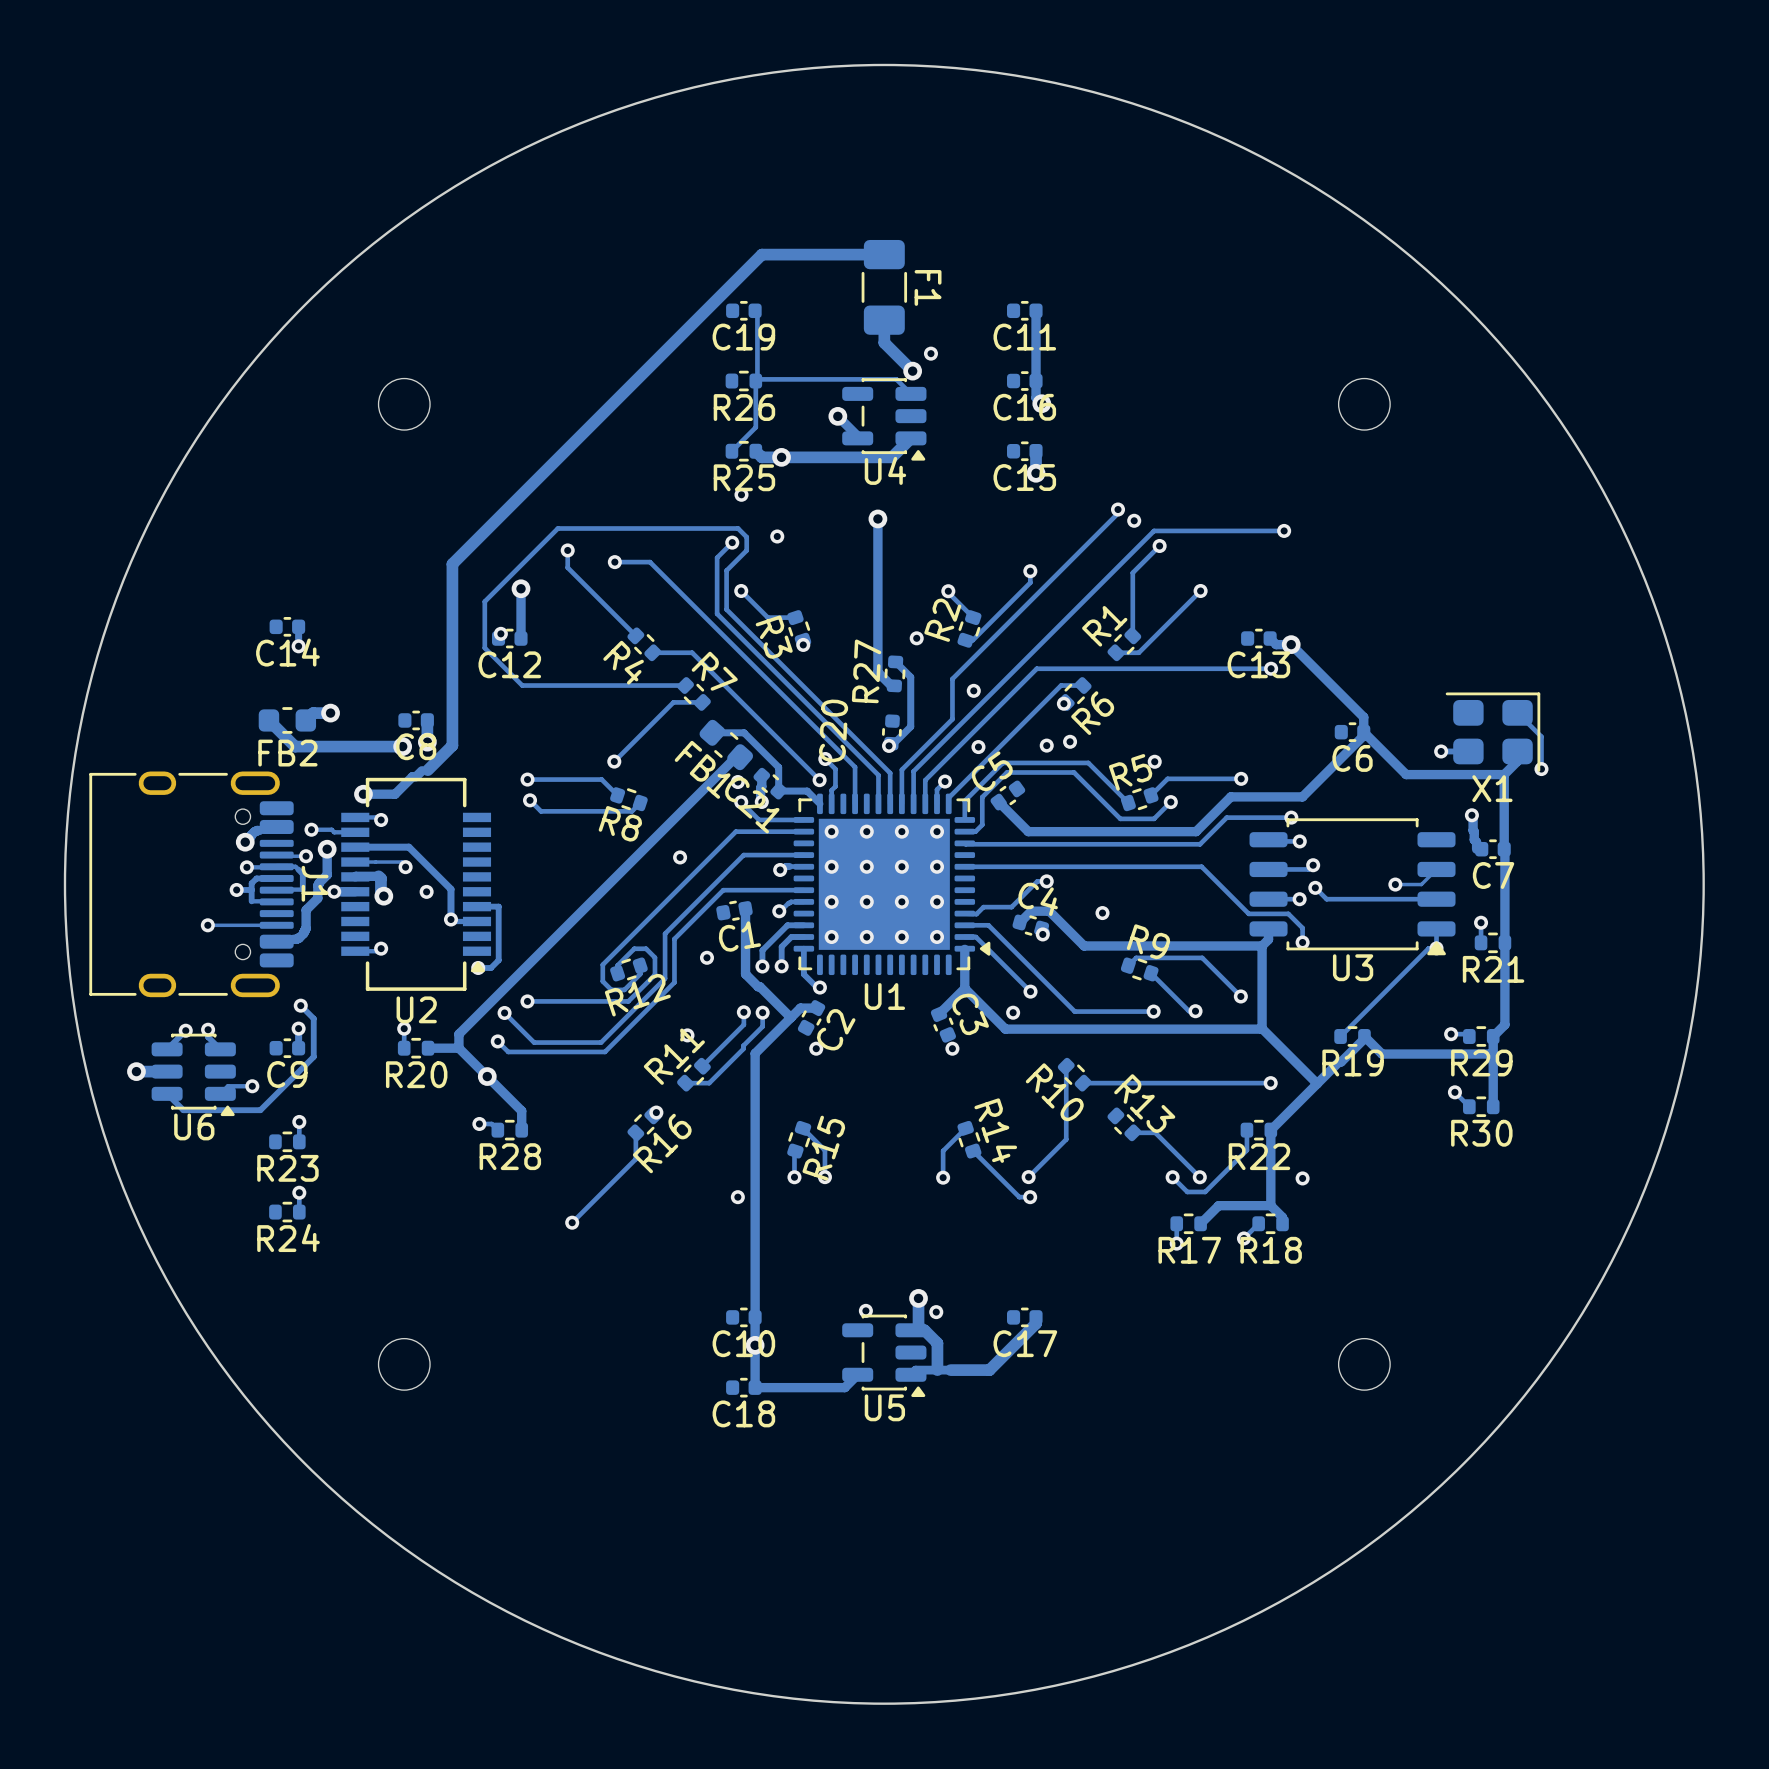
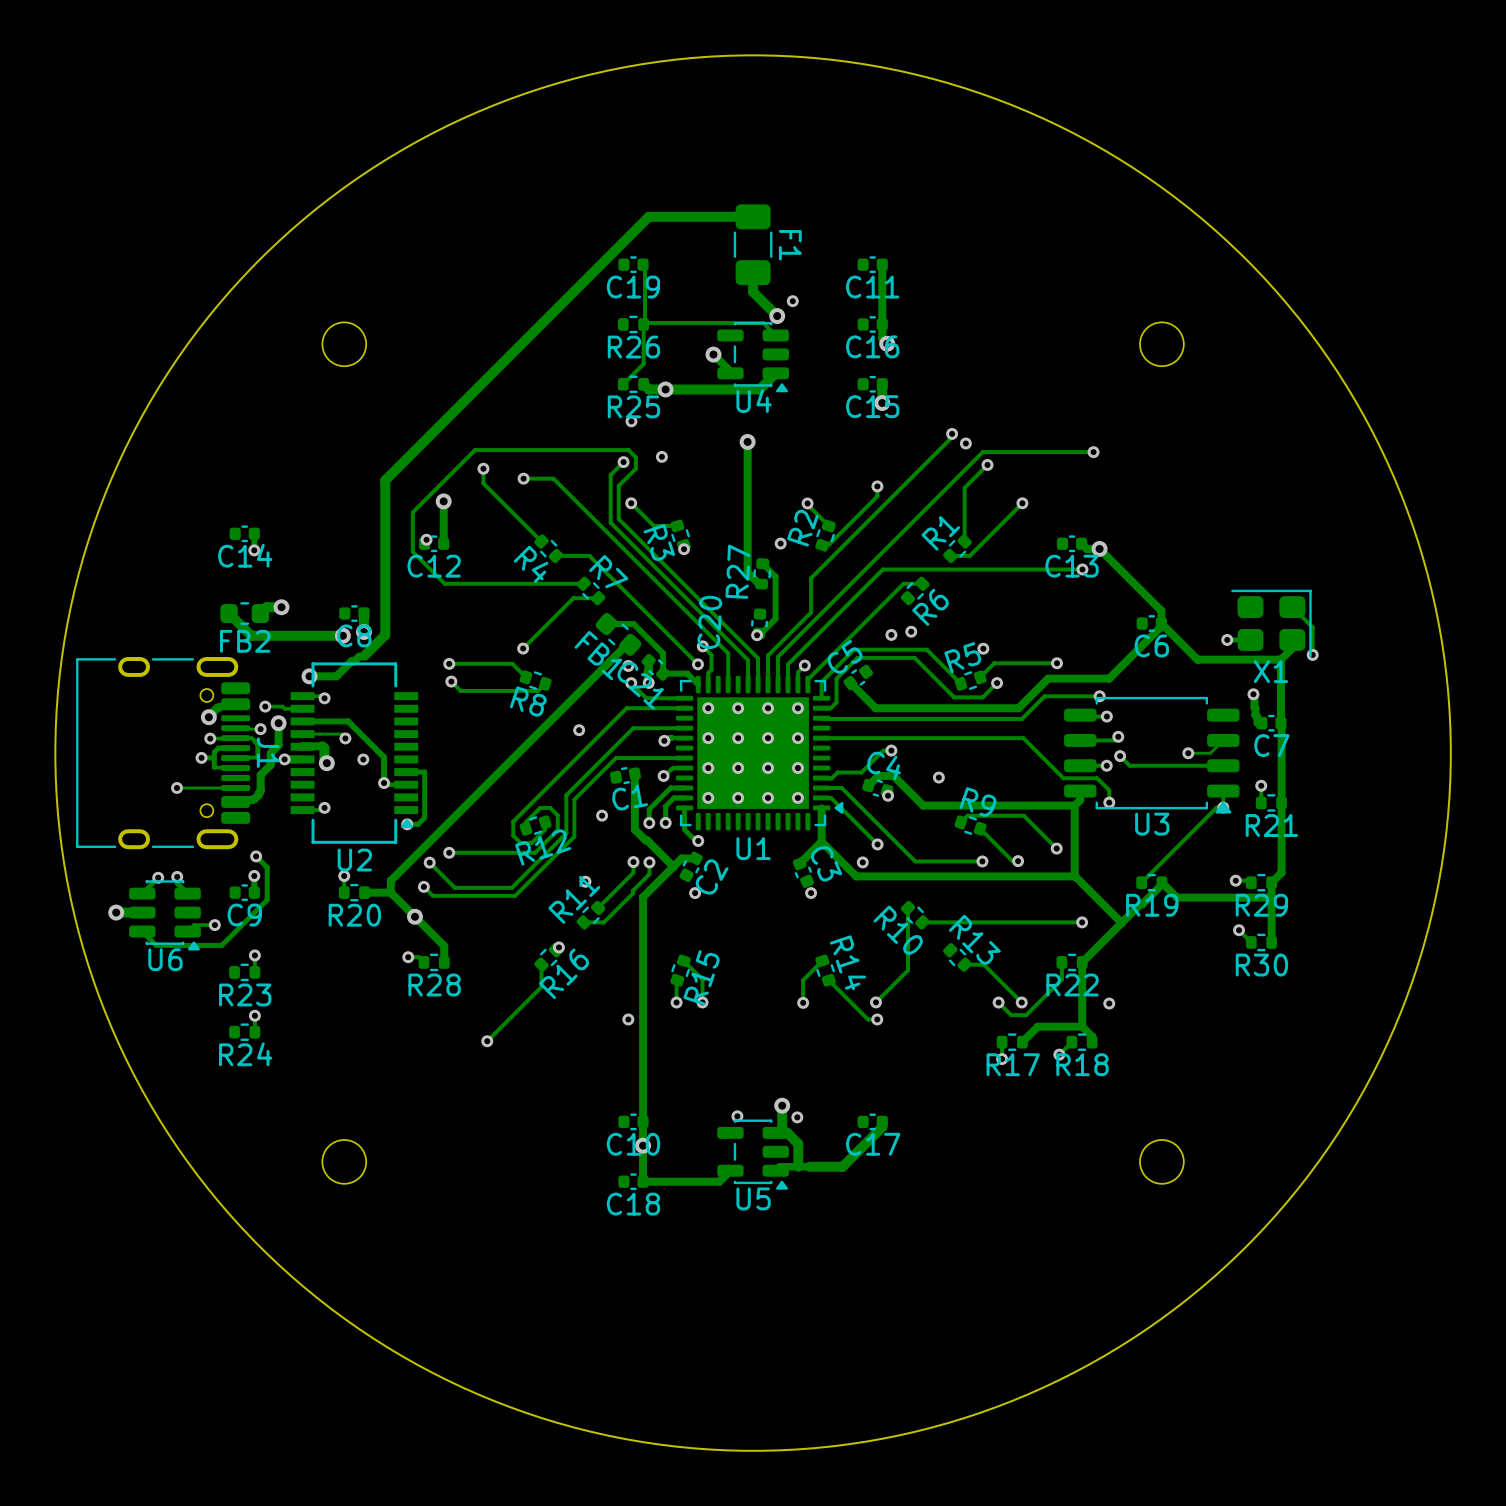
via: (973, 690) -> none
via: (1063, 703) -> none
via: (978, 747) -> none

